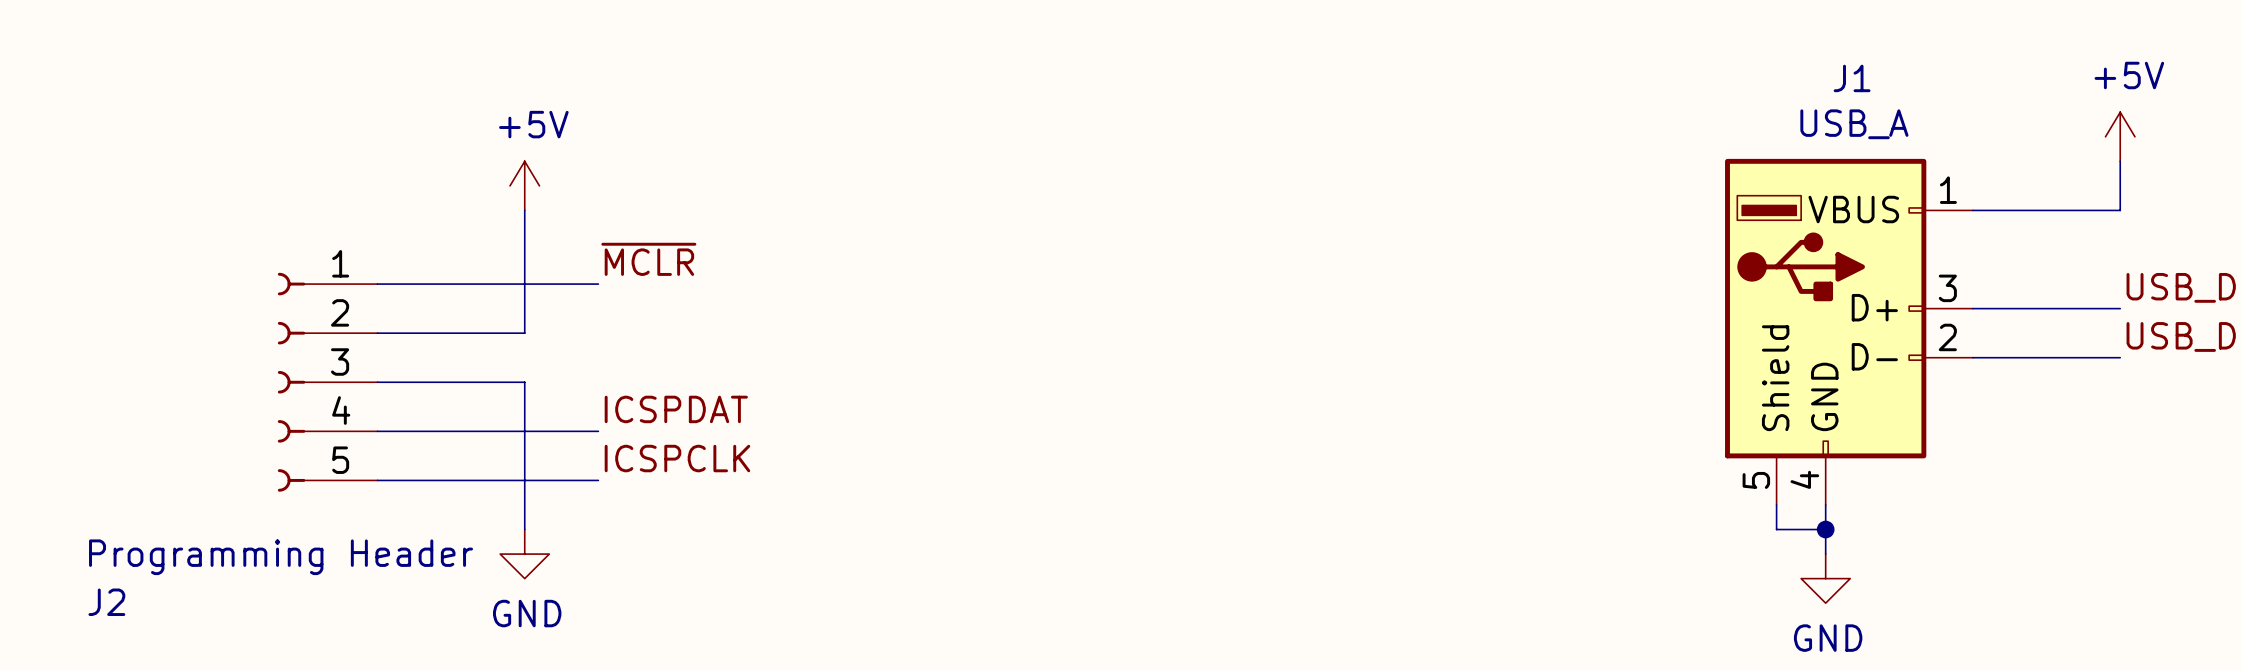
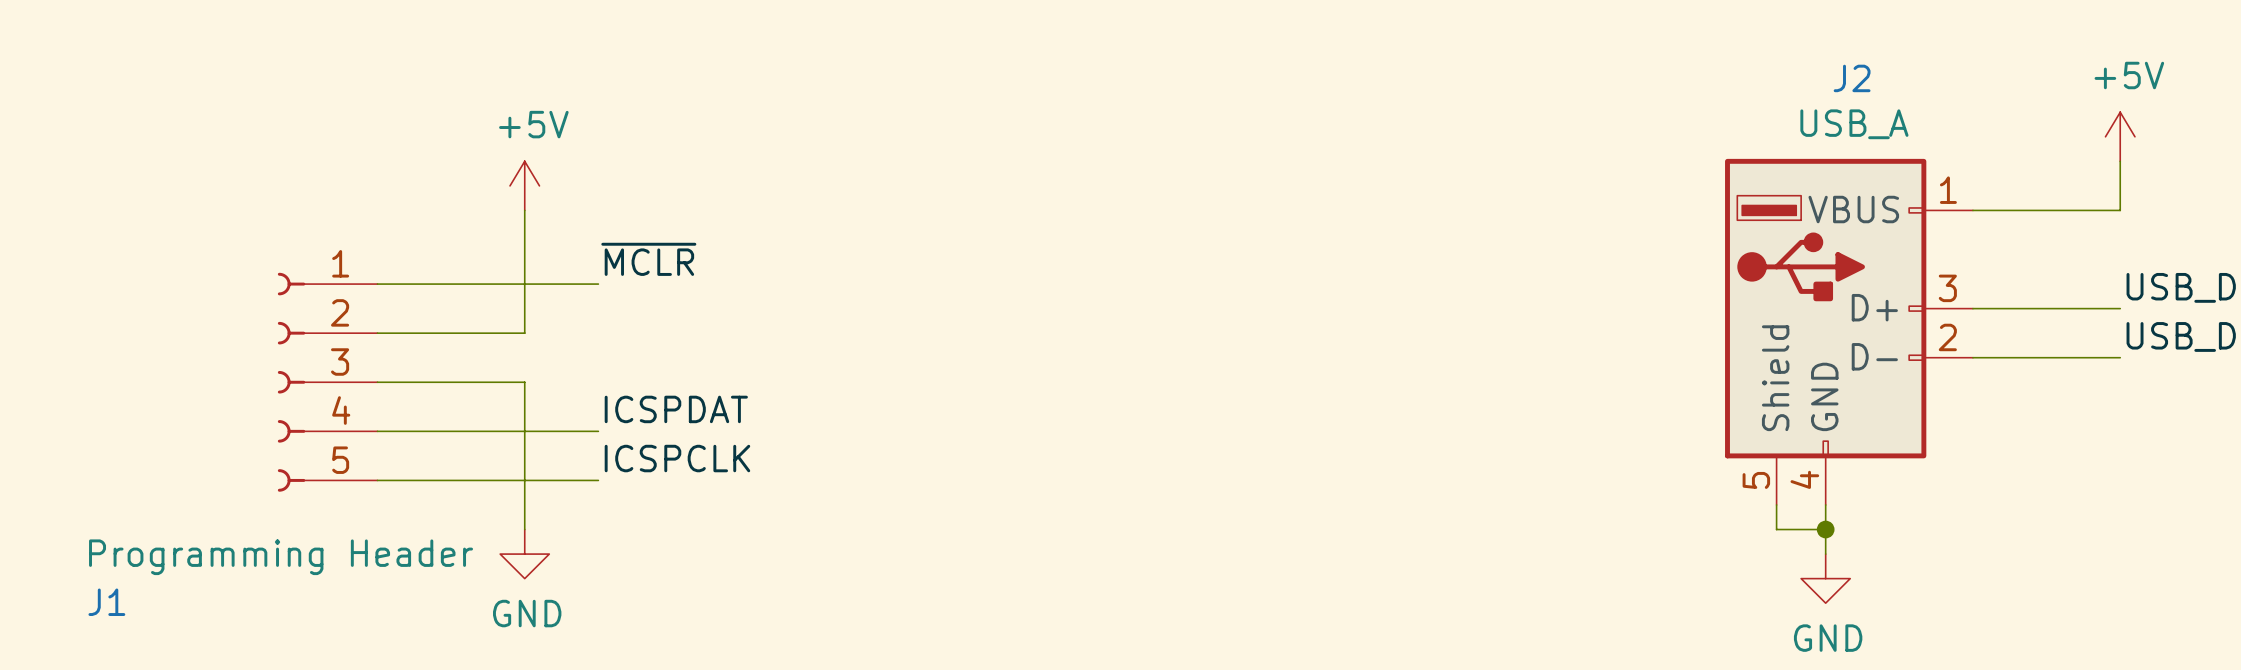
J1 name: J1 (1852, 78) -> J2 (1852, 78)
J2 name: J2 (106, 602) -> J1 (106, 602)

